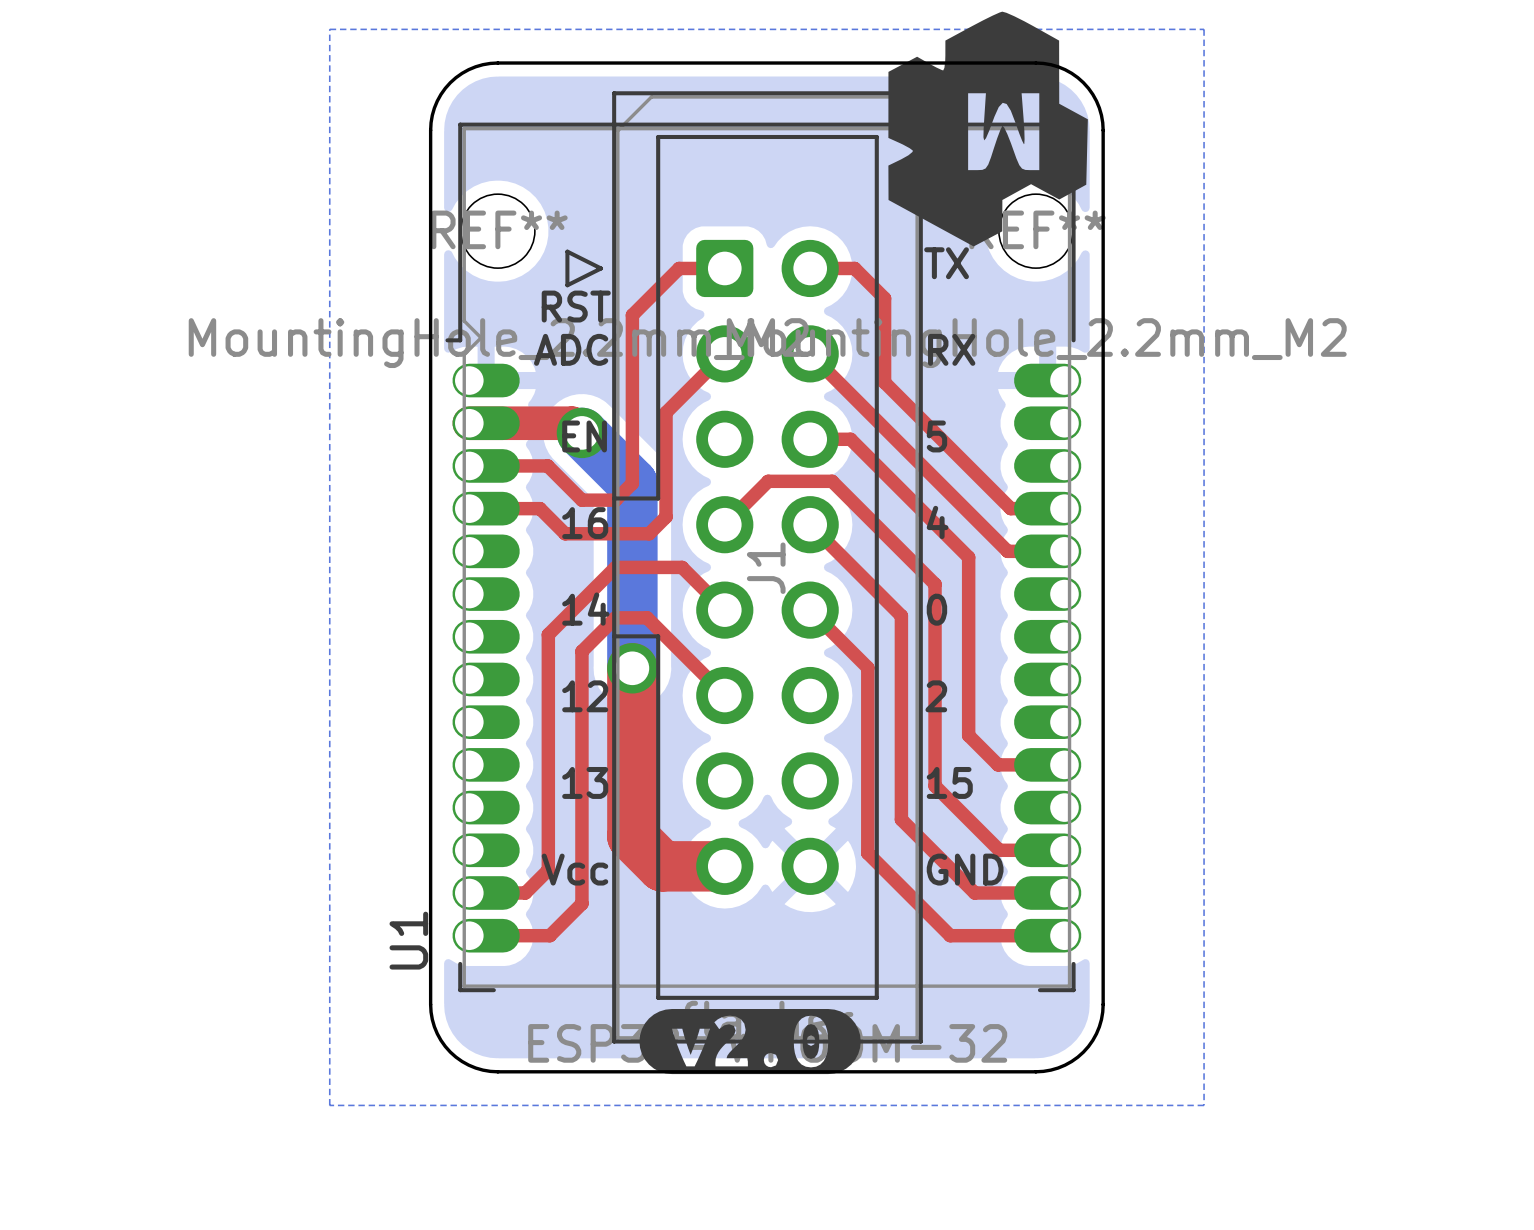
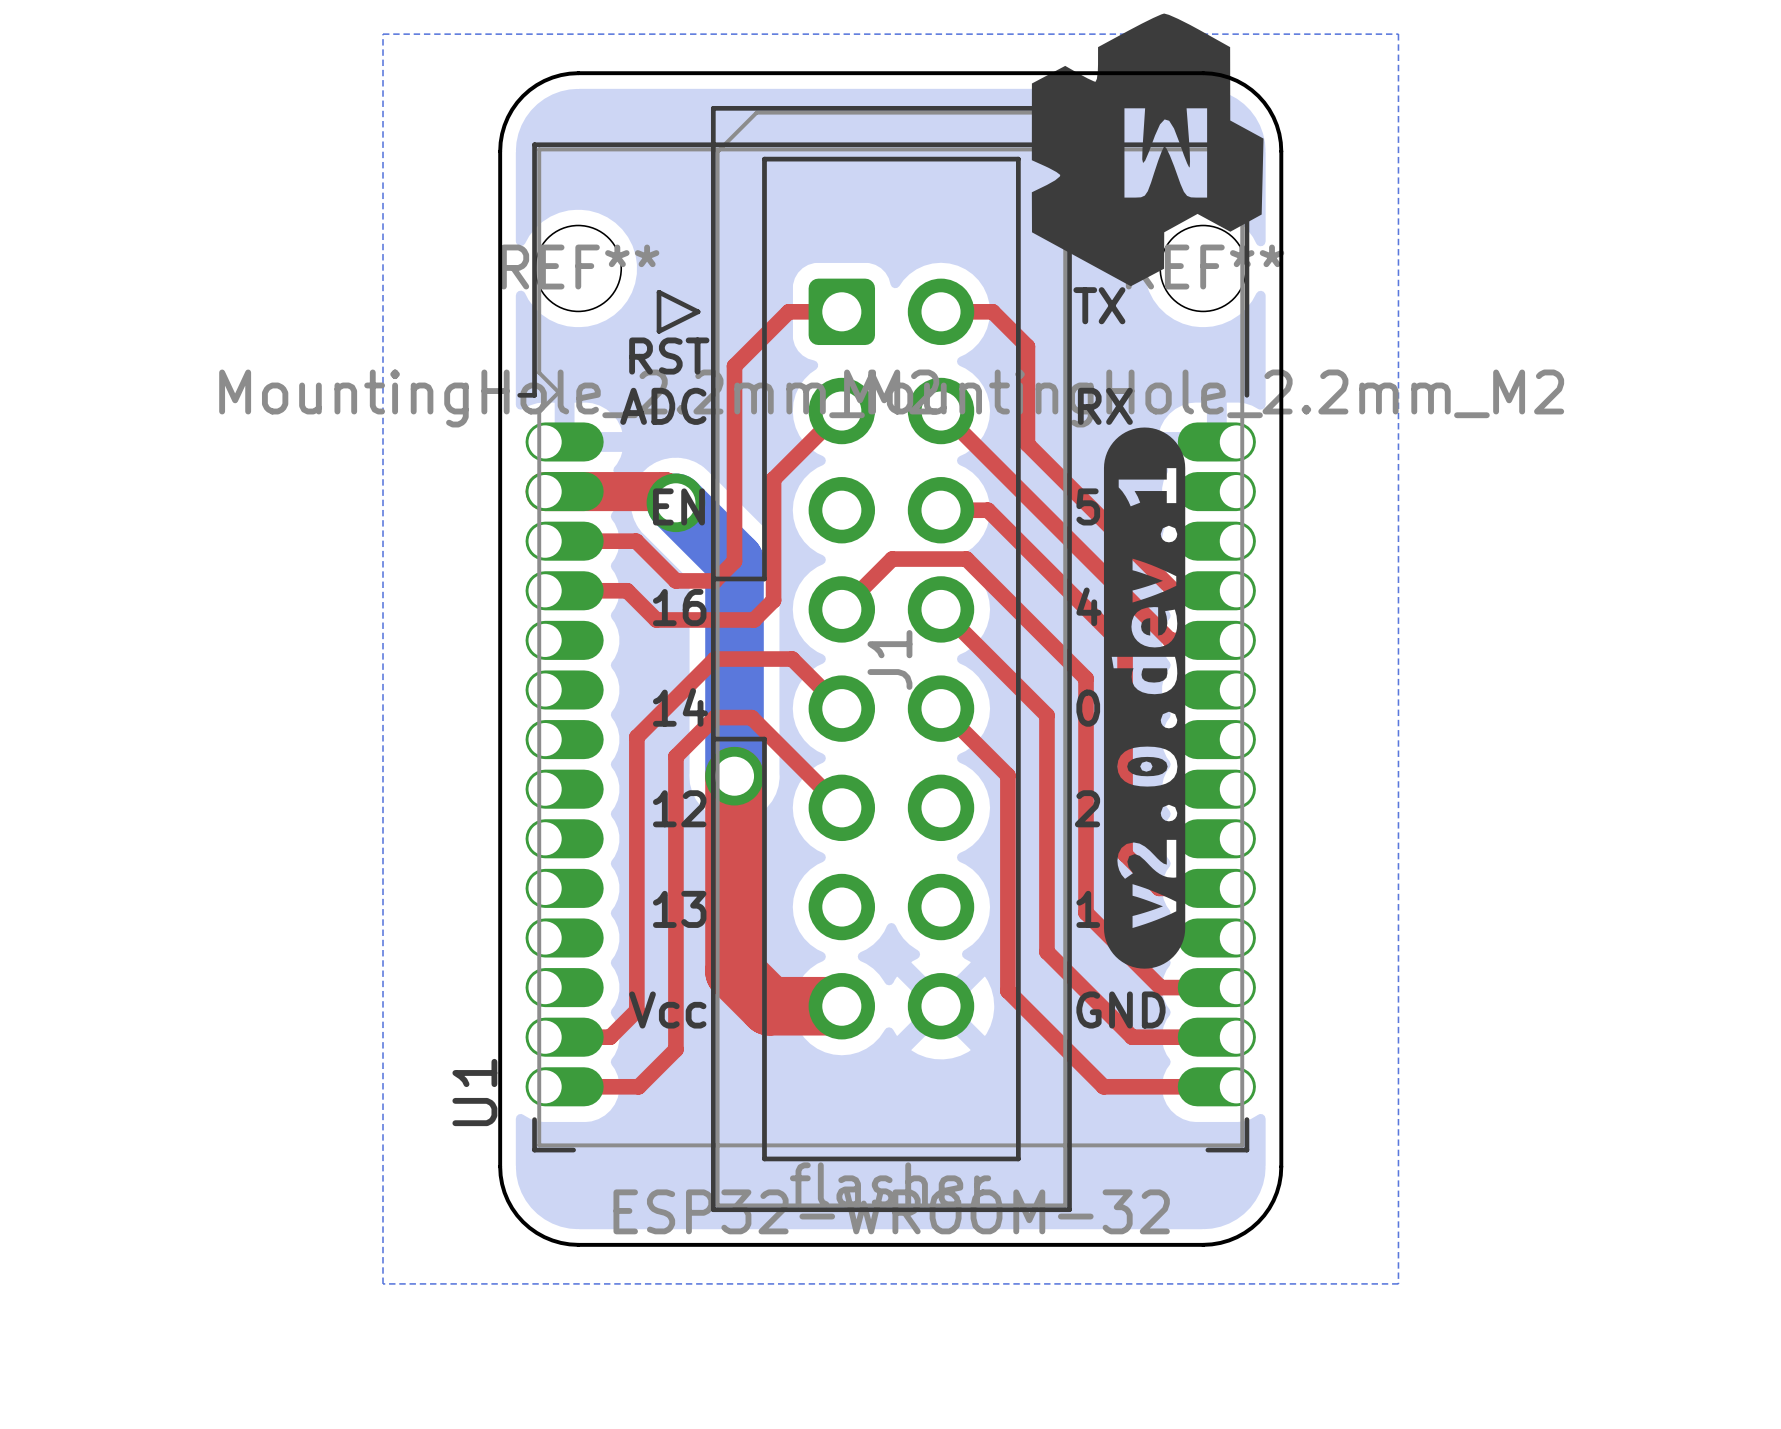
drawing: none -> [1103, 427, 1186, 969]
drawing: [639, 1009, 861, 1075] -> none

